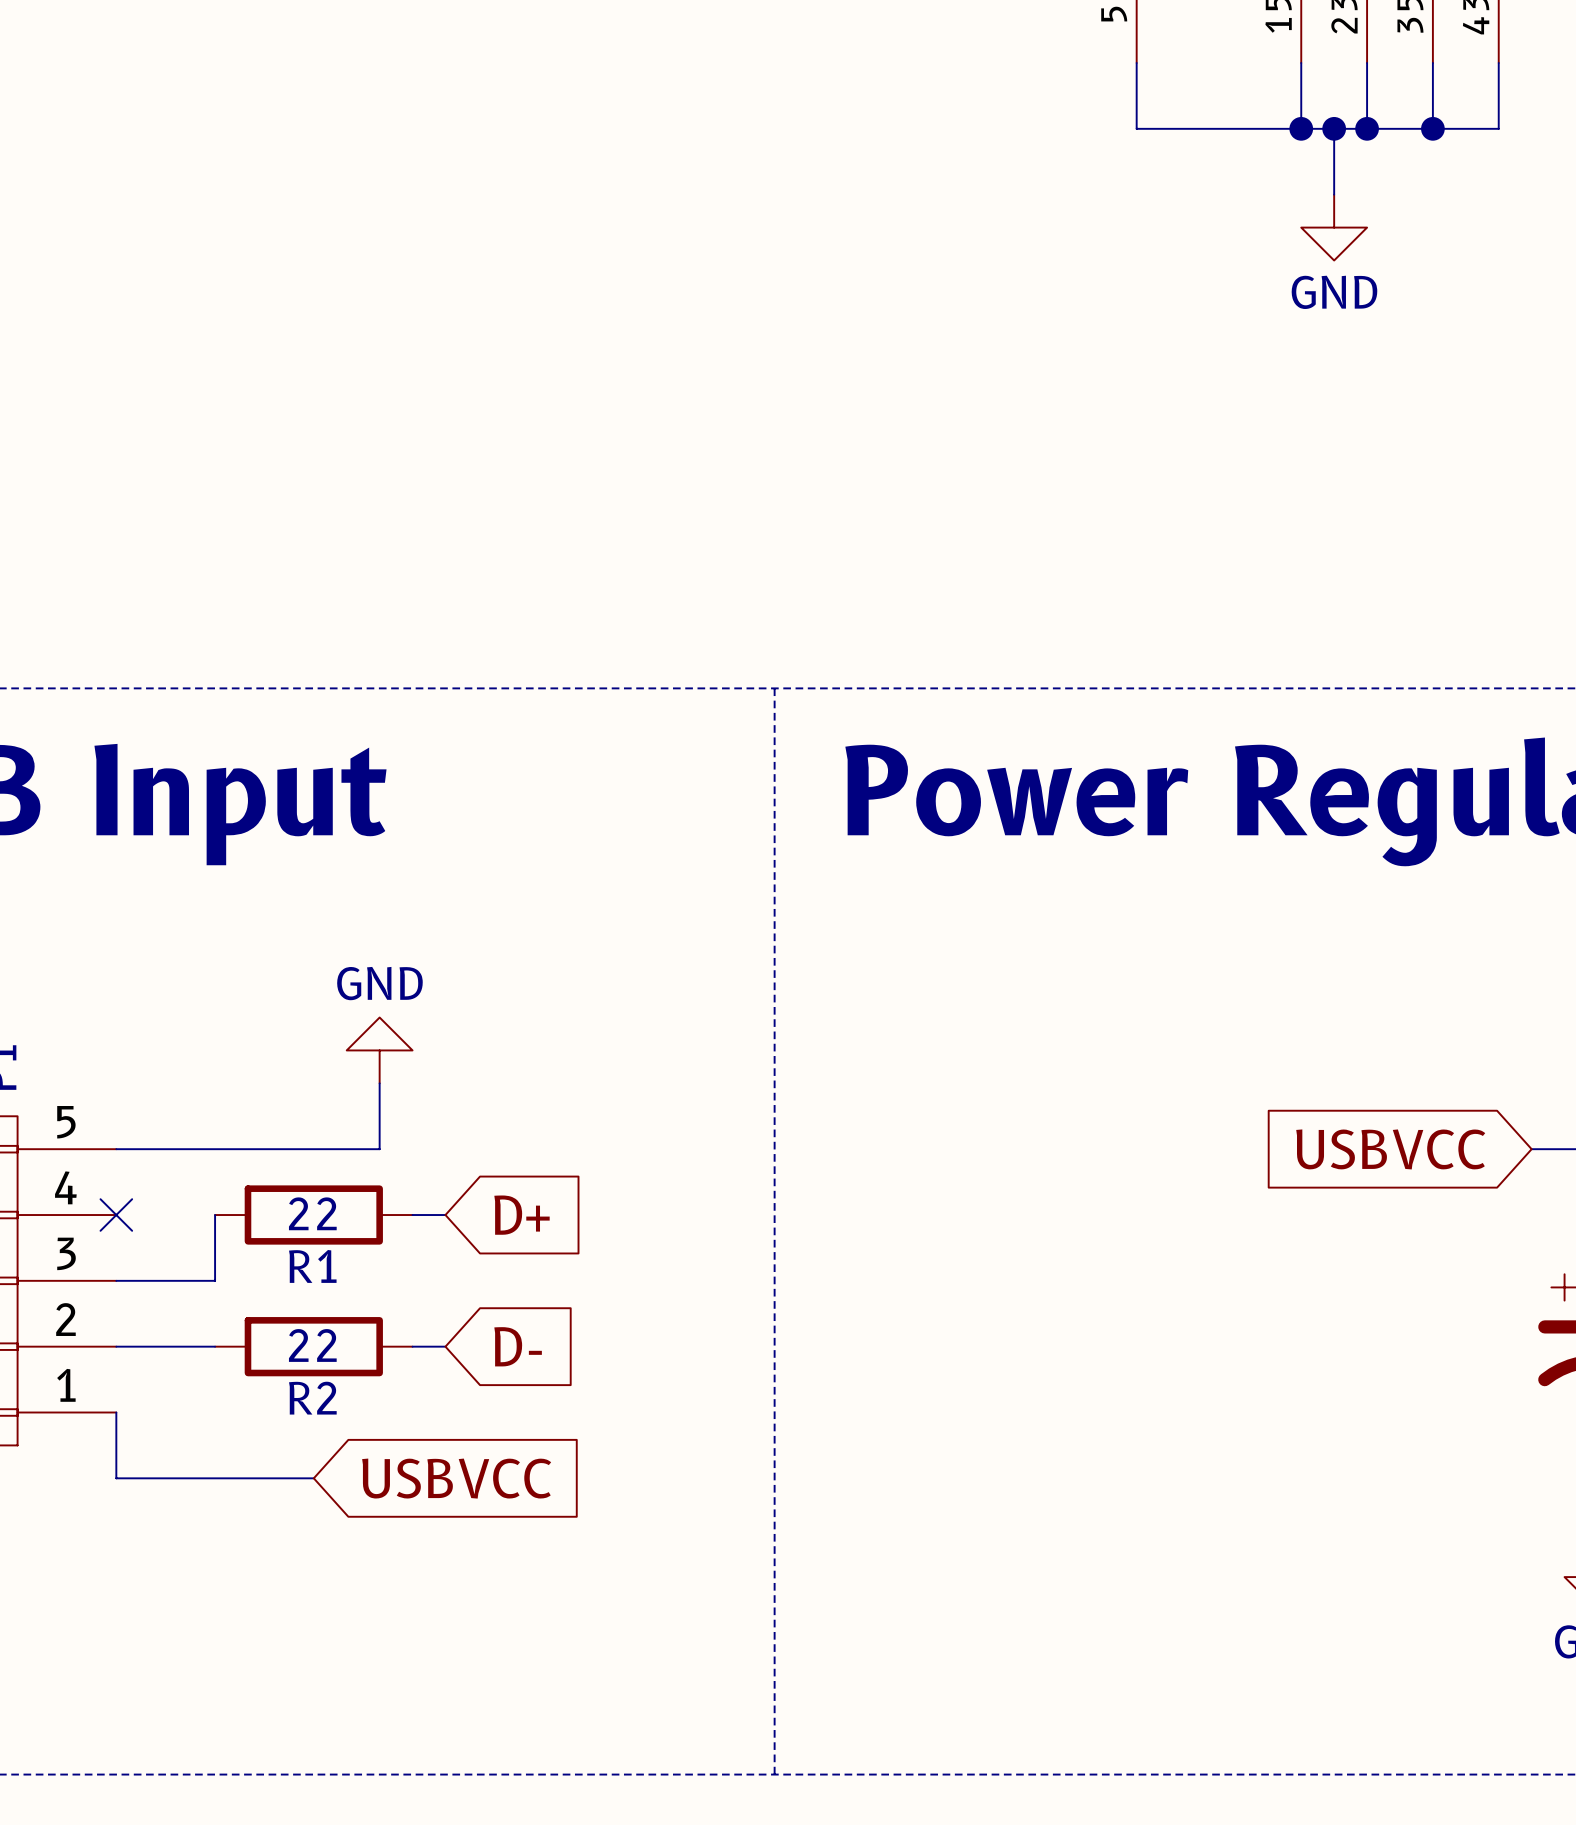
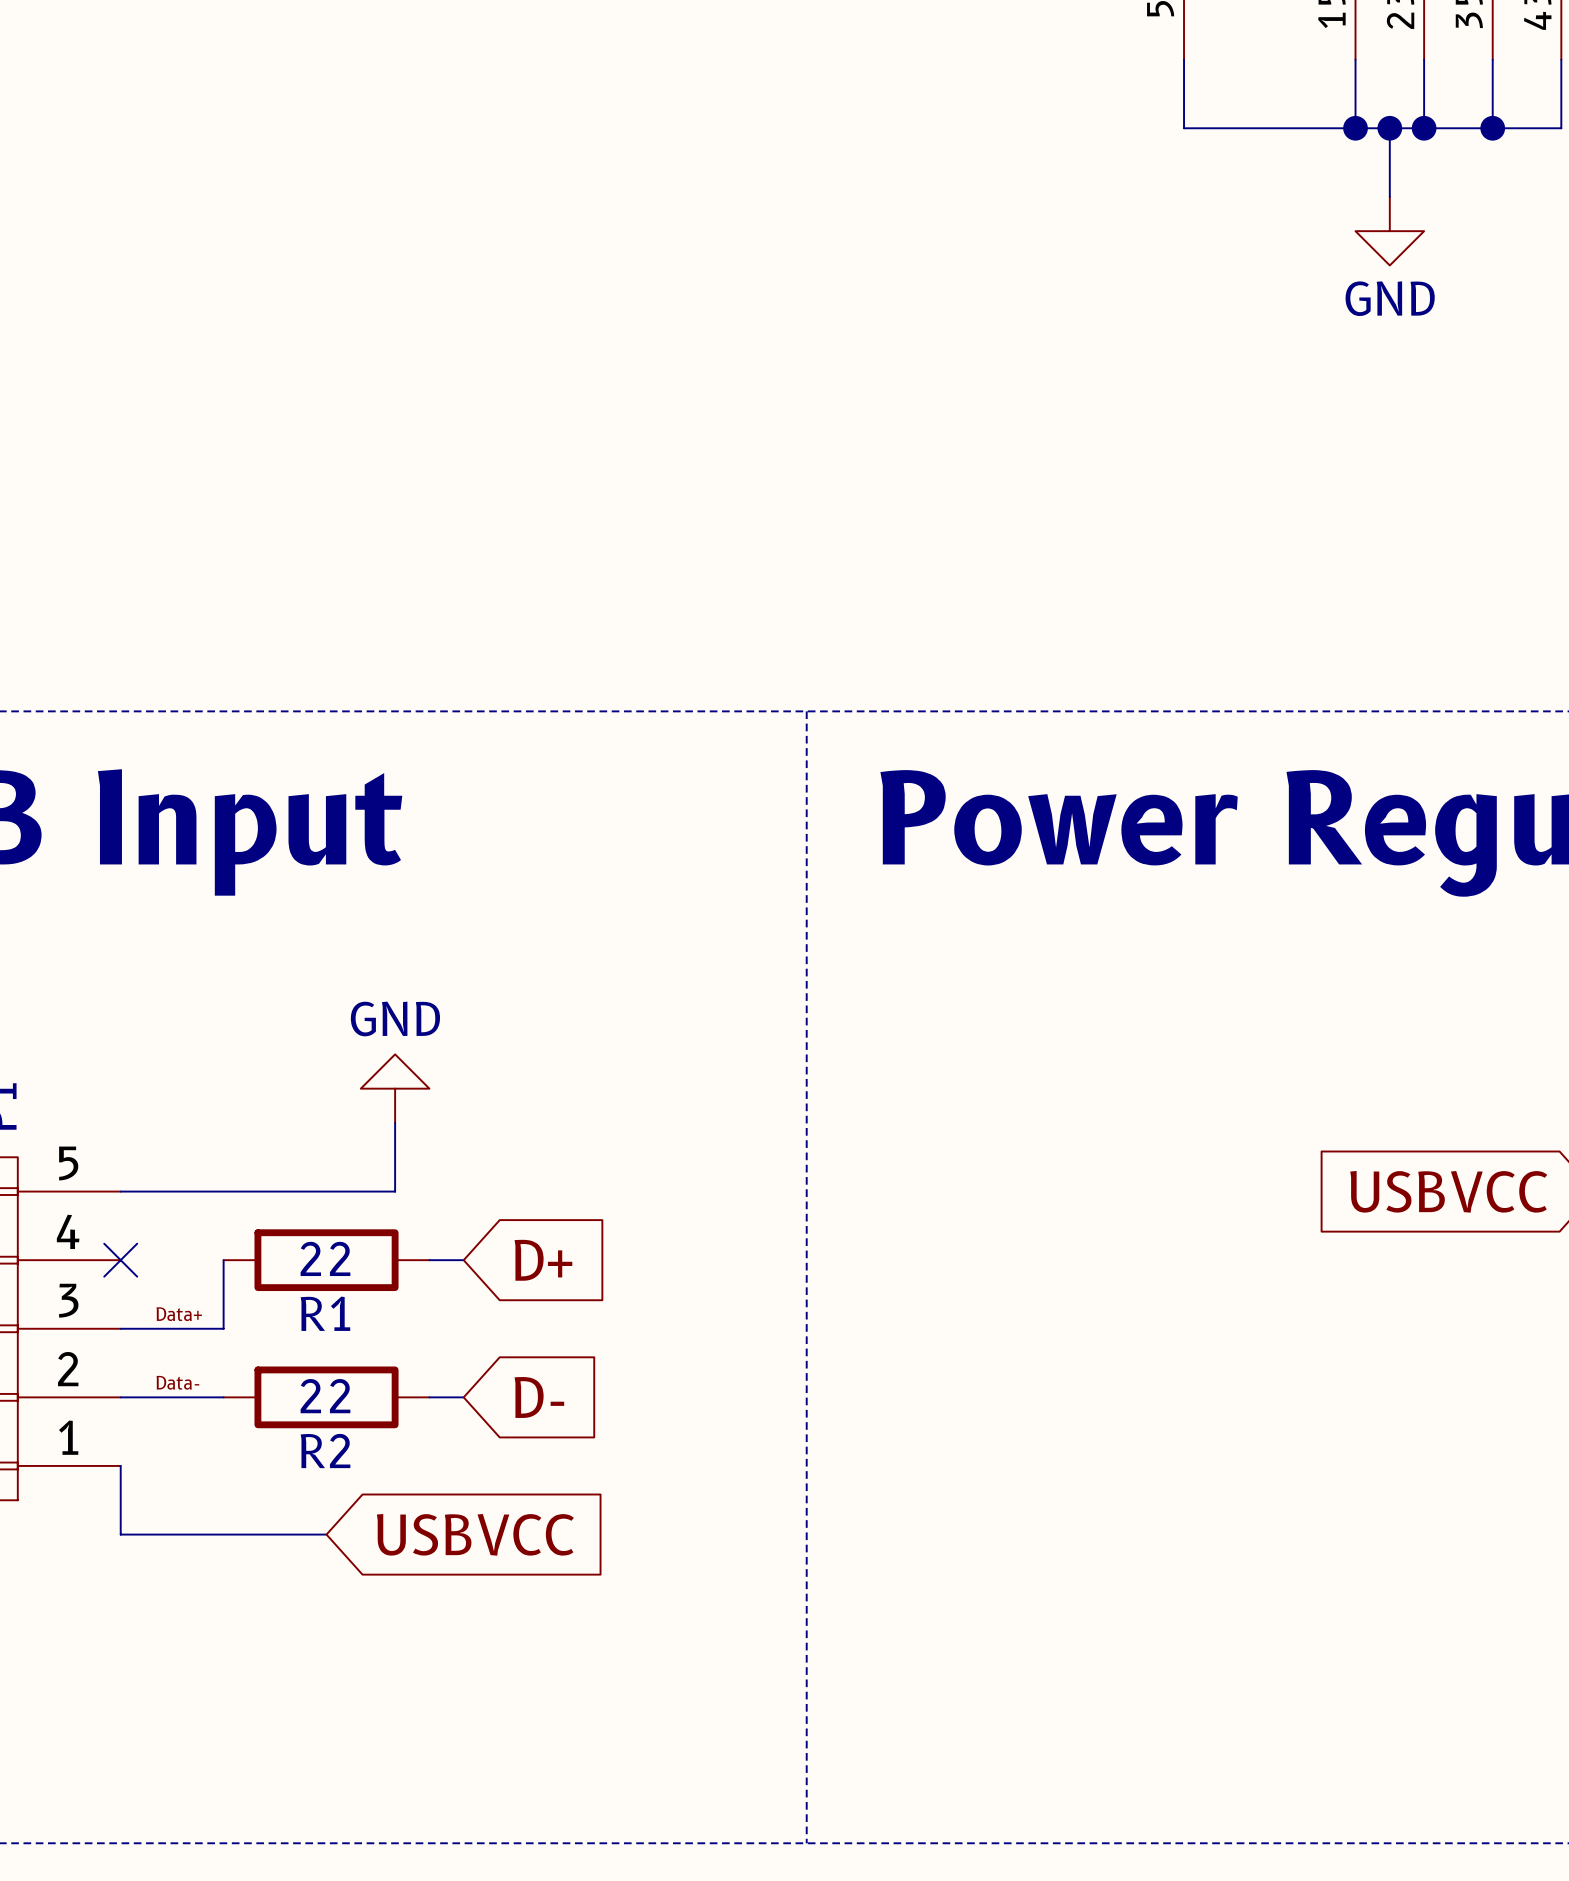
label: none -> Data+ (179, 1314)
label: none -> Data- (177, 1382)

